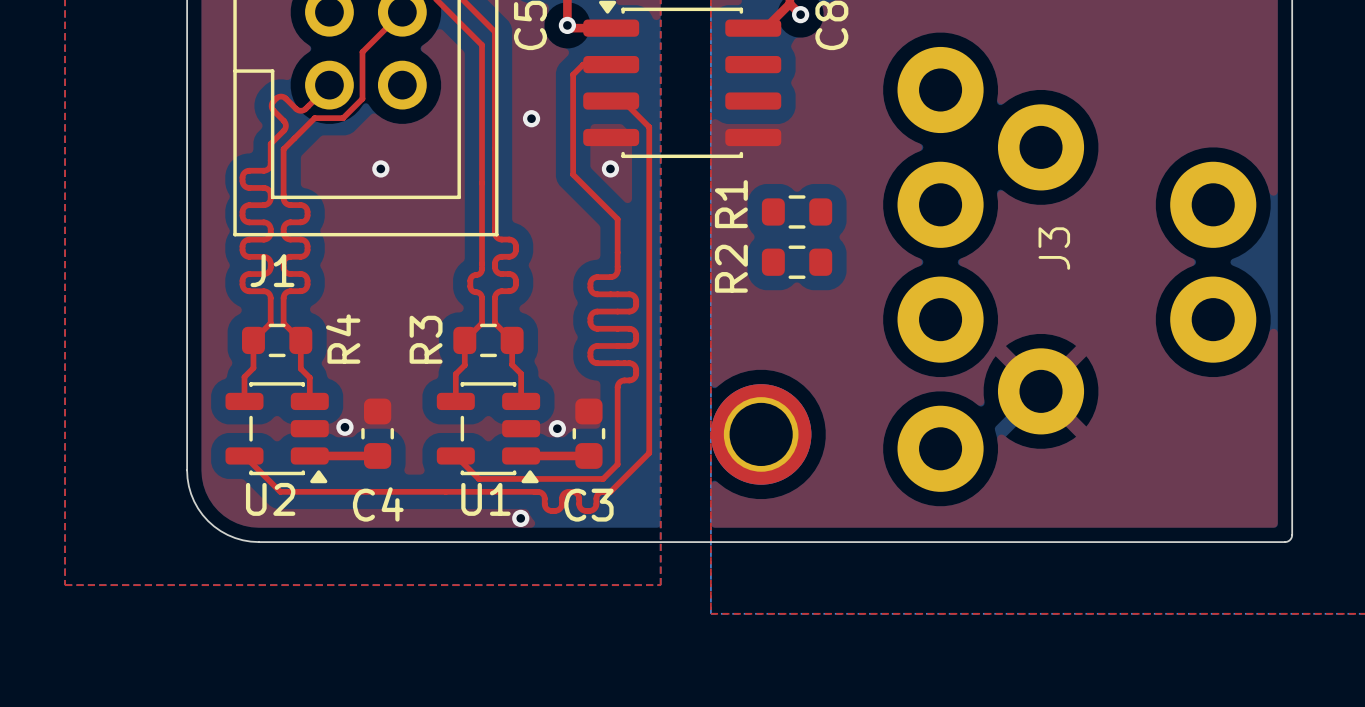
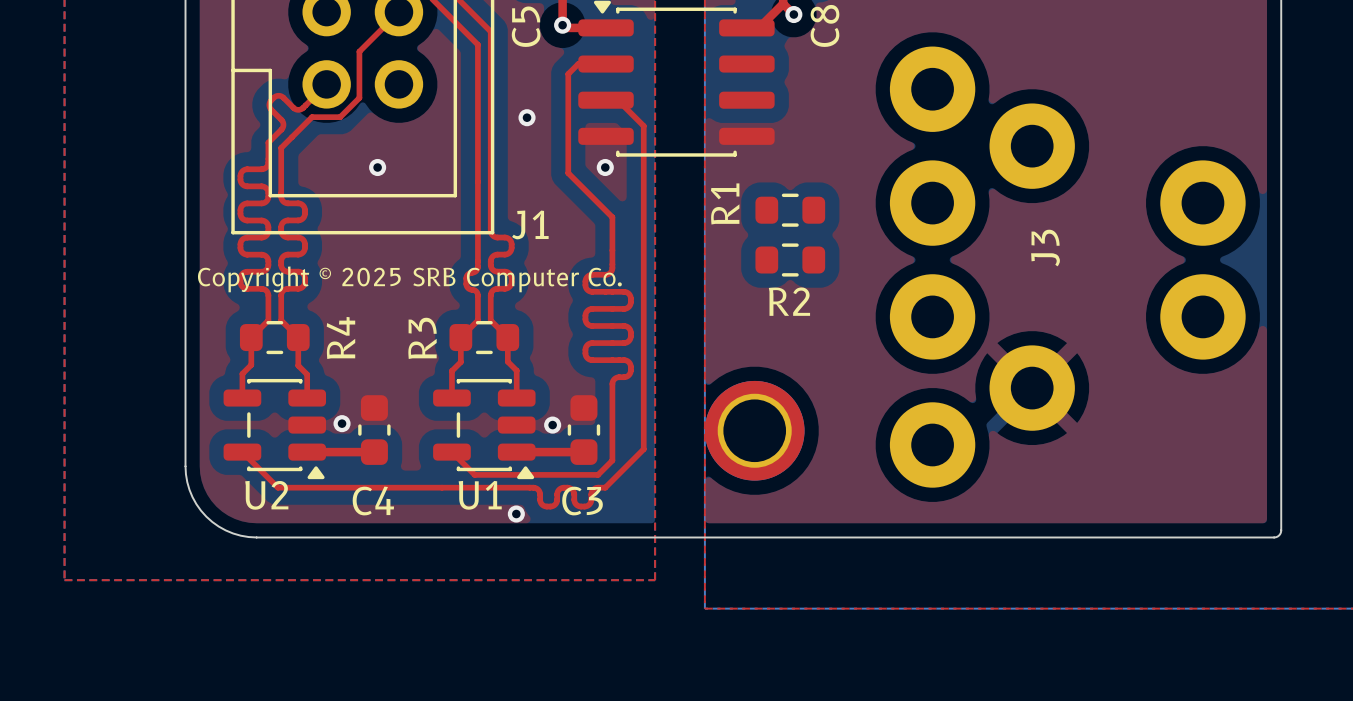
R2 name rotation: 0° (731, 268) -> 90° clockwise (789, 301)
R2 name position: R2 (731, 268) -> R2 (789, 301)
J1 name position: J1 (272, 270) -> J1 (530, 224)
text: none -> Copyright © 2025 SRB Computer Co. (409, 279)

